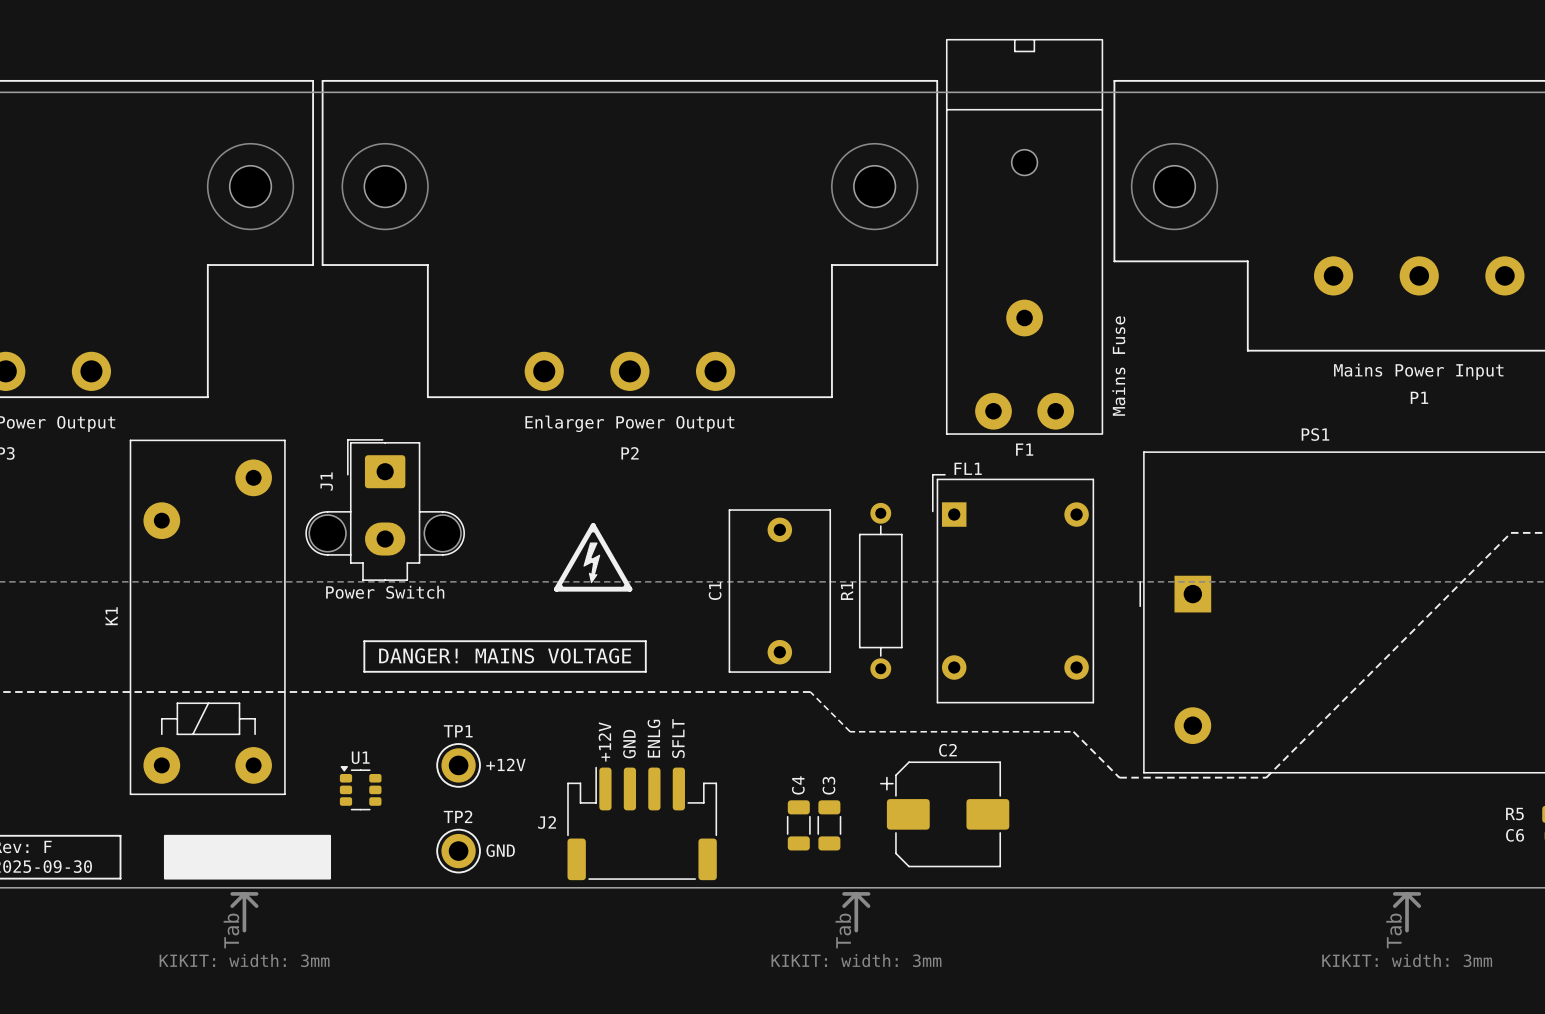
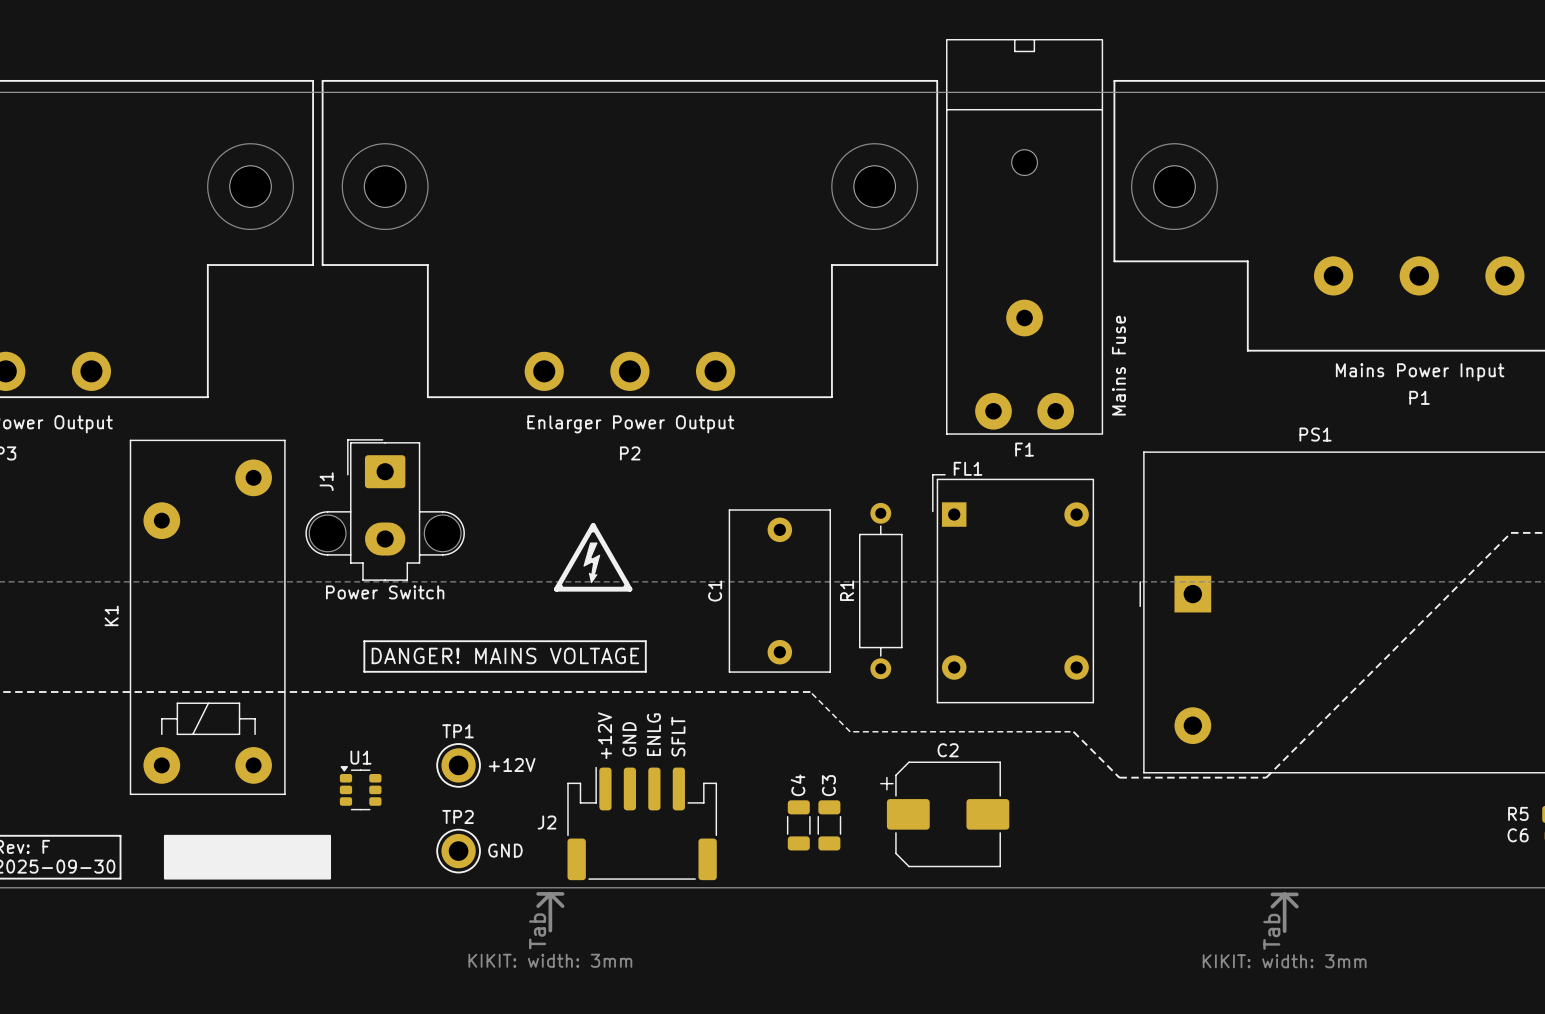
drawing: [230, 892, 259, 933] -> none
drawing: none -> [536, 892, 565, 933]
drawing: [842, 892, 871, 933] -> none
drawing position: (1407, 912) -> (1284, 912)

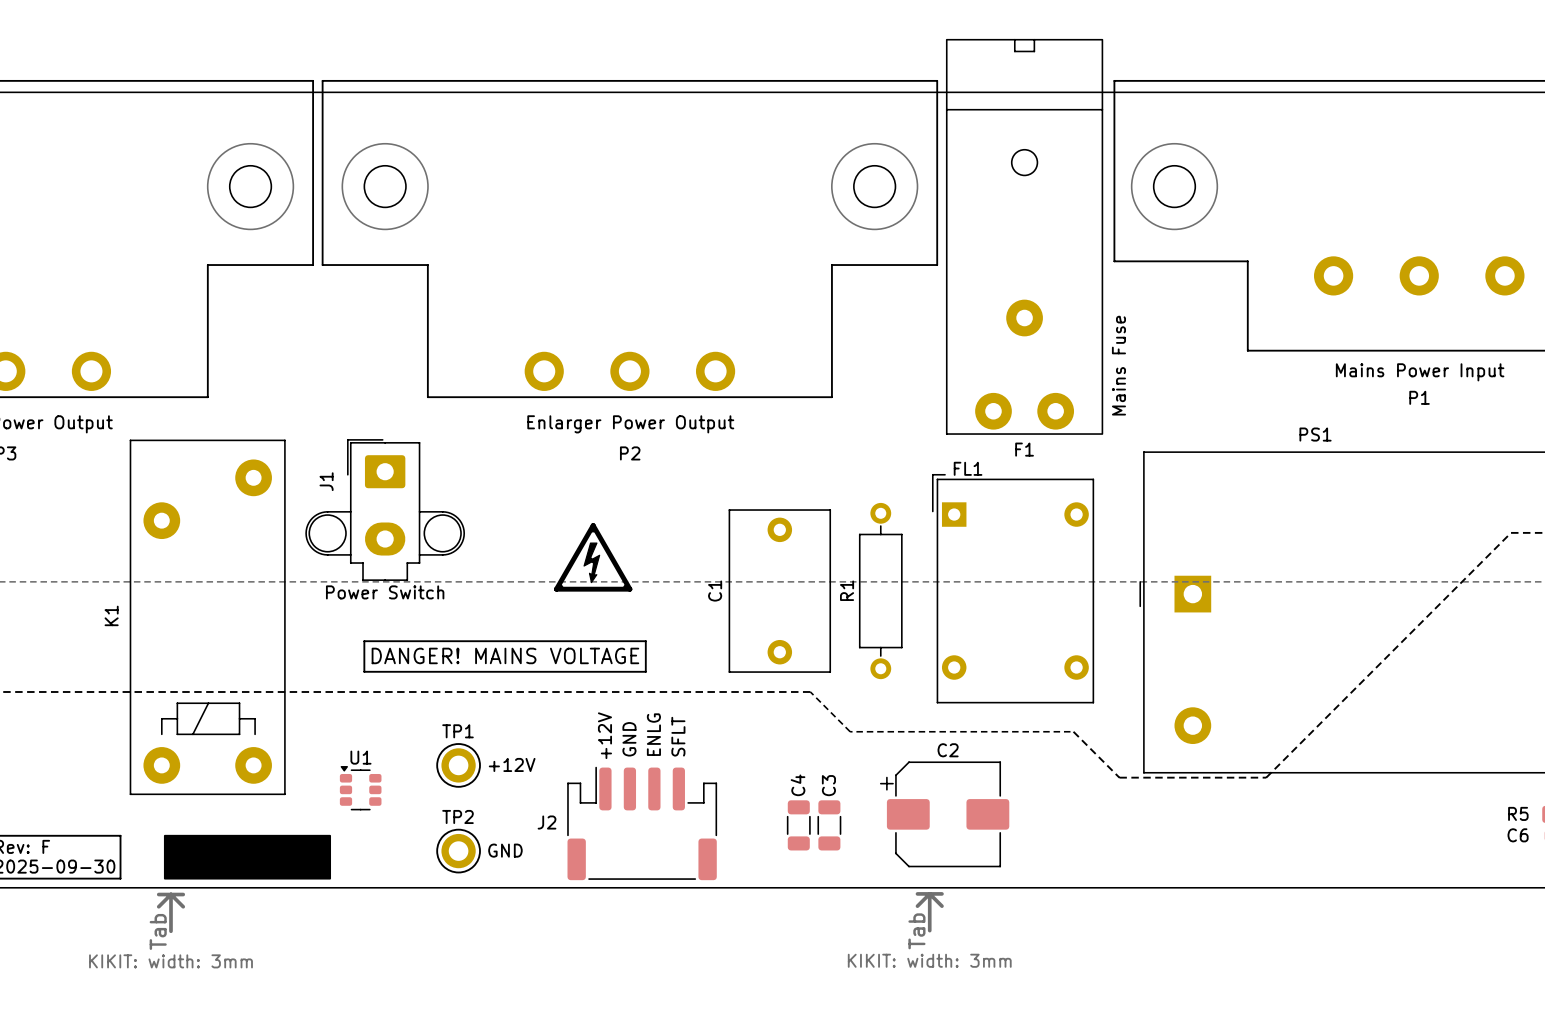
drawing: none -> [156, 892, 186, 934]
drawing: [536, 892, 565, 933] -> none
drawing: none -> [915, 892, 944, 933]
drawing: [1270, 892, 1299, 933] -> none

